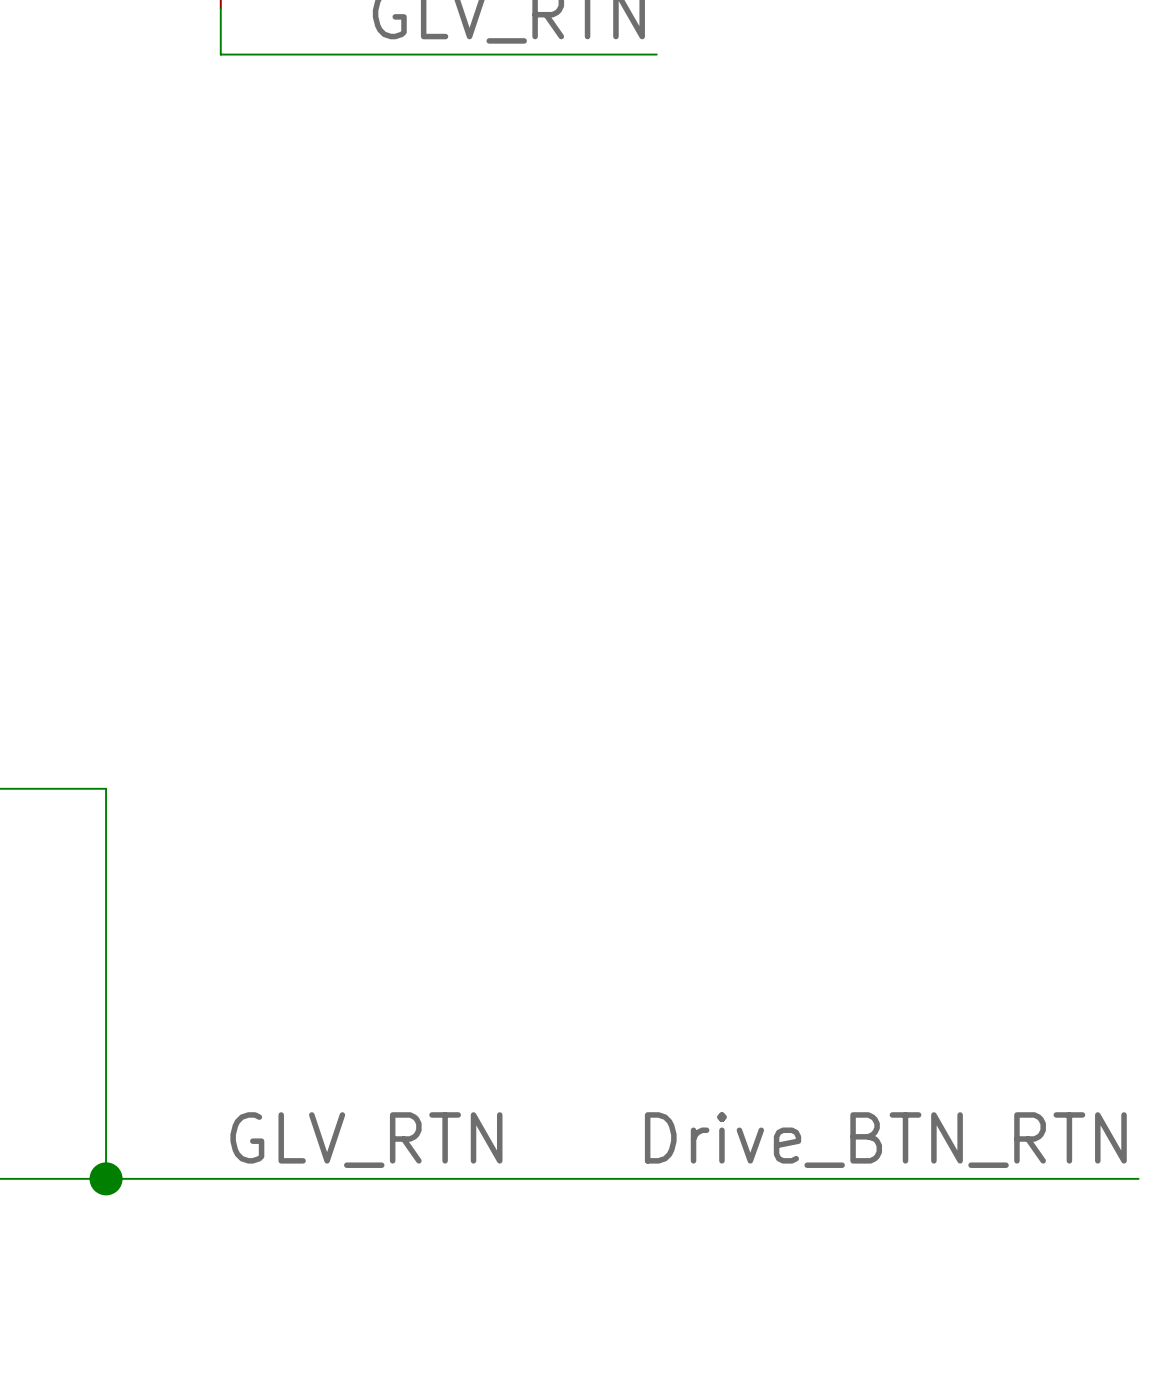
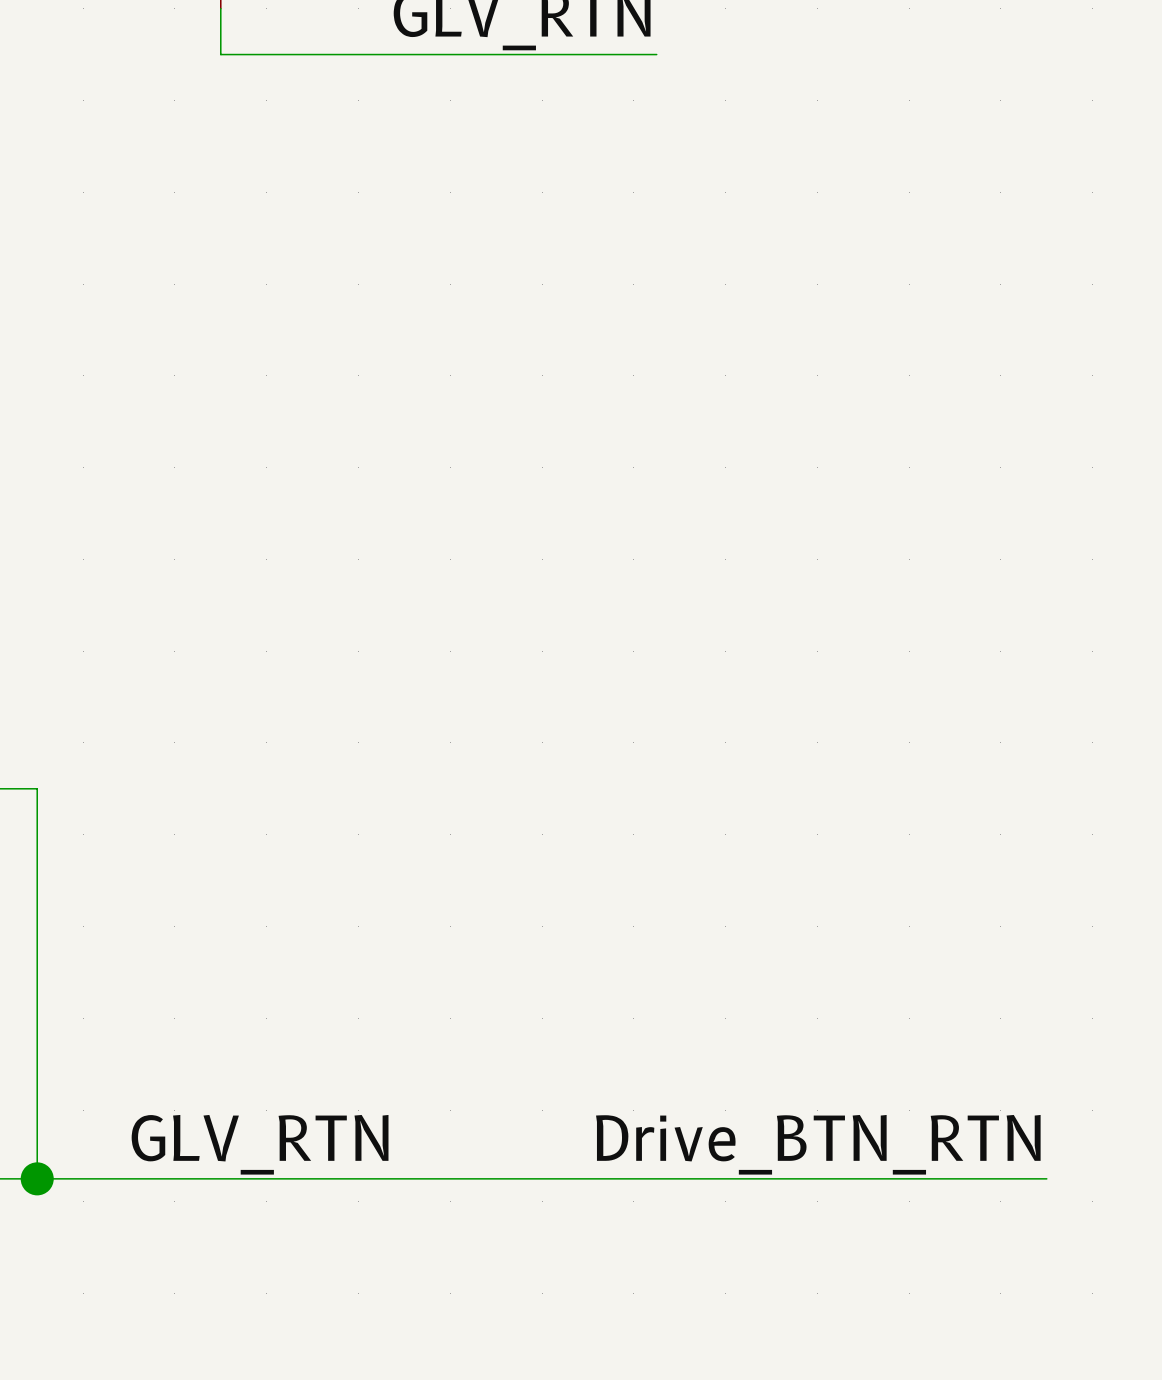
wire: (37, 788) (106, 788) (106, 1178) -> (37, 788) (37, 1178)
label position: GLV_RTN (366, 1140) -> GLV_RTN (260, 1144)
label position: Drive_BTN_RTN (885, 1140) -> Drive_BTN_RTN (818, 1144)
junction position: (106, 1178) -> (37, 1178)
wire: (1046, 1178) (1138, 1178) -> none

